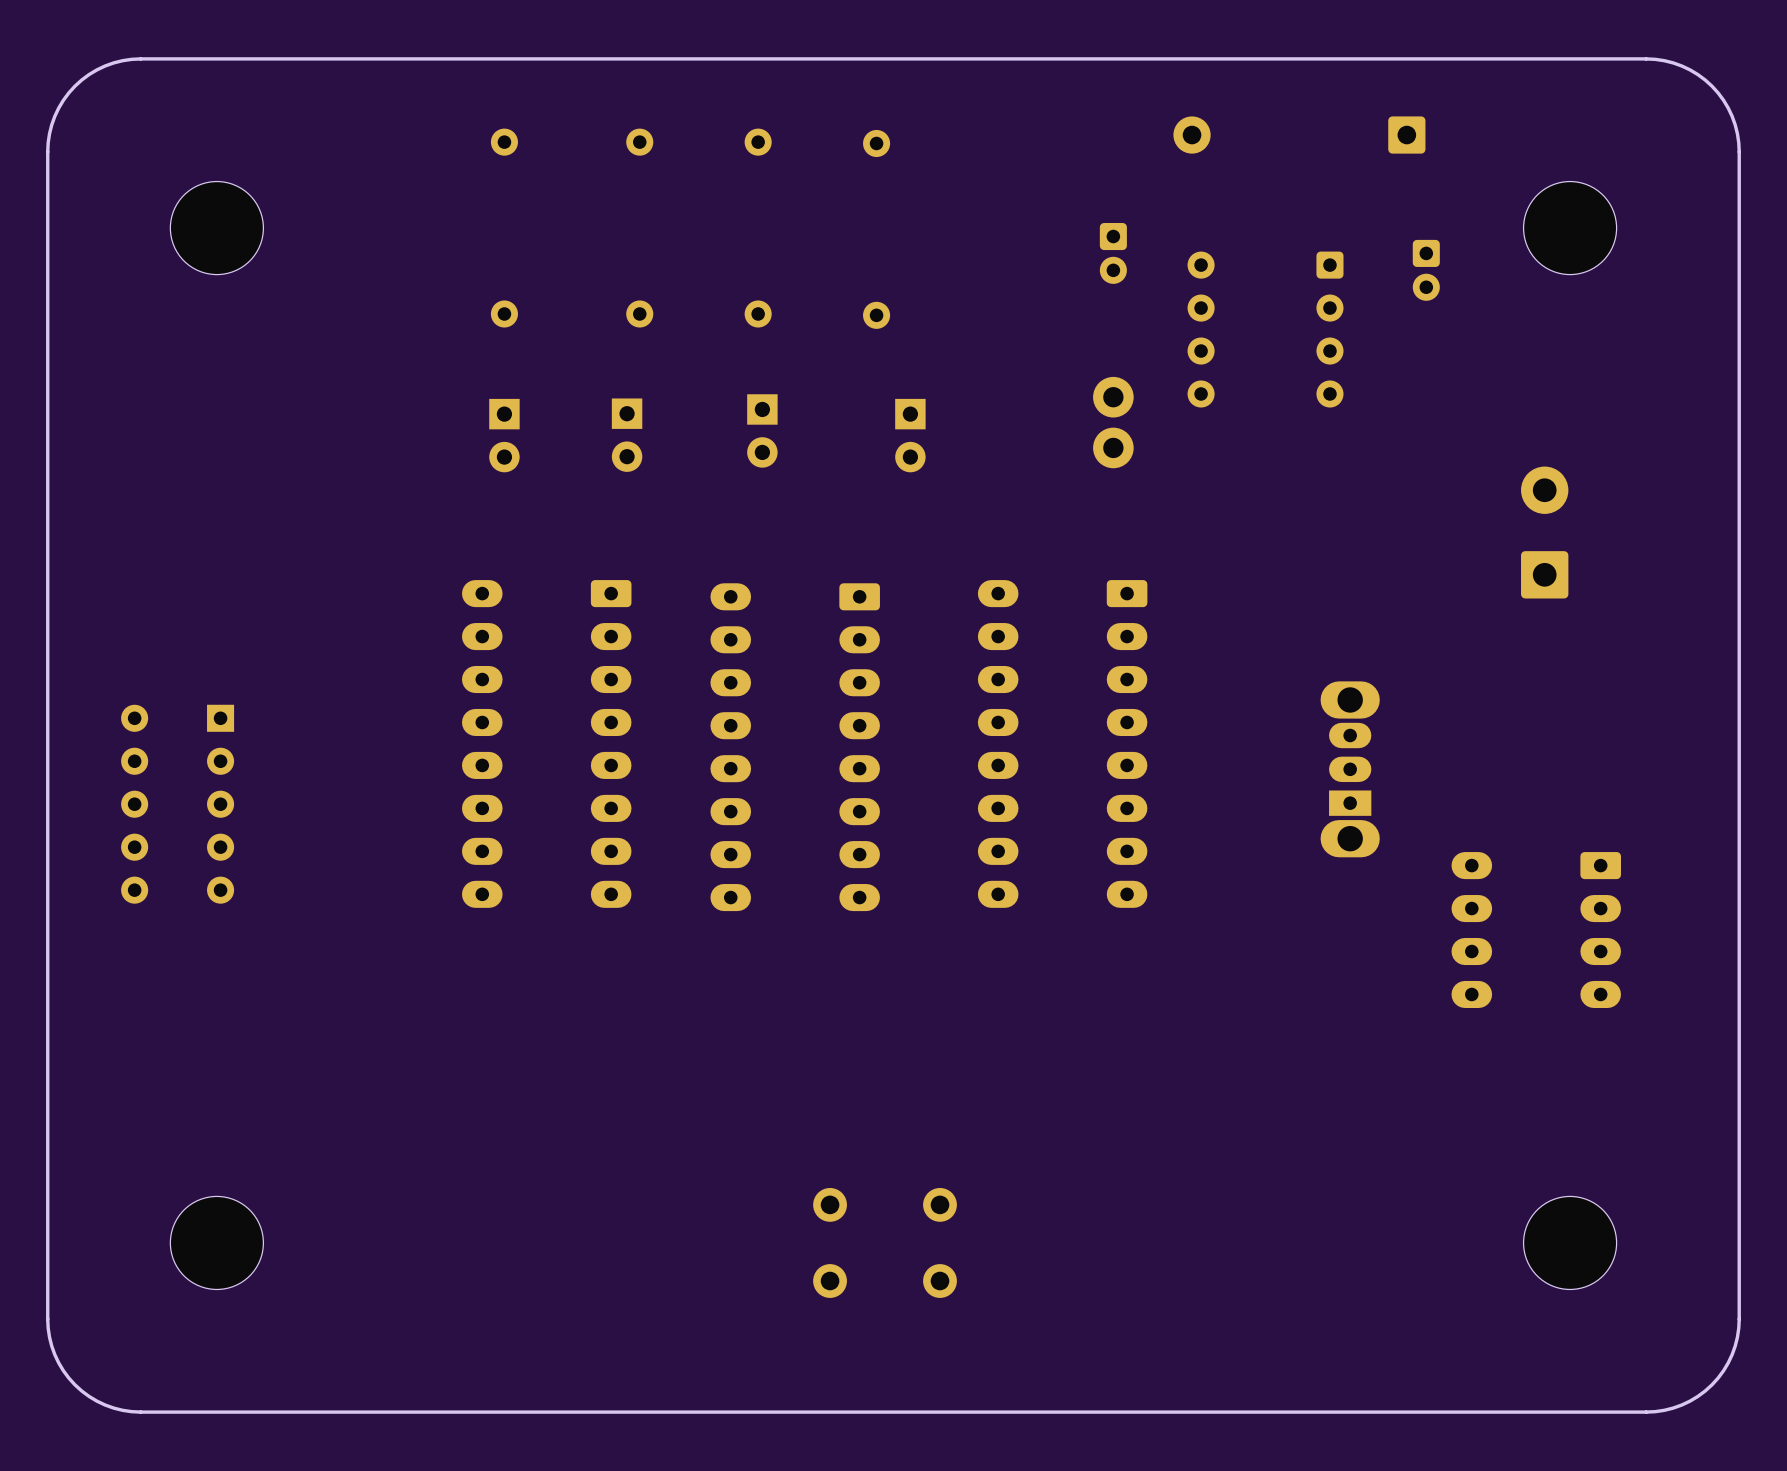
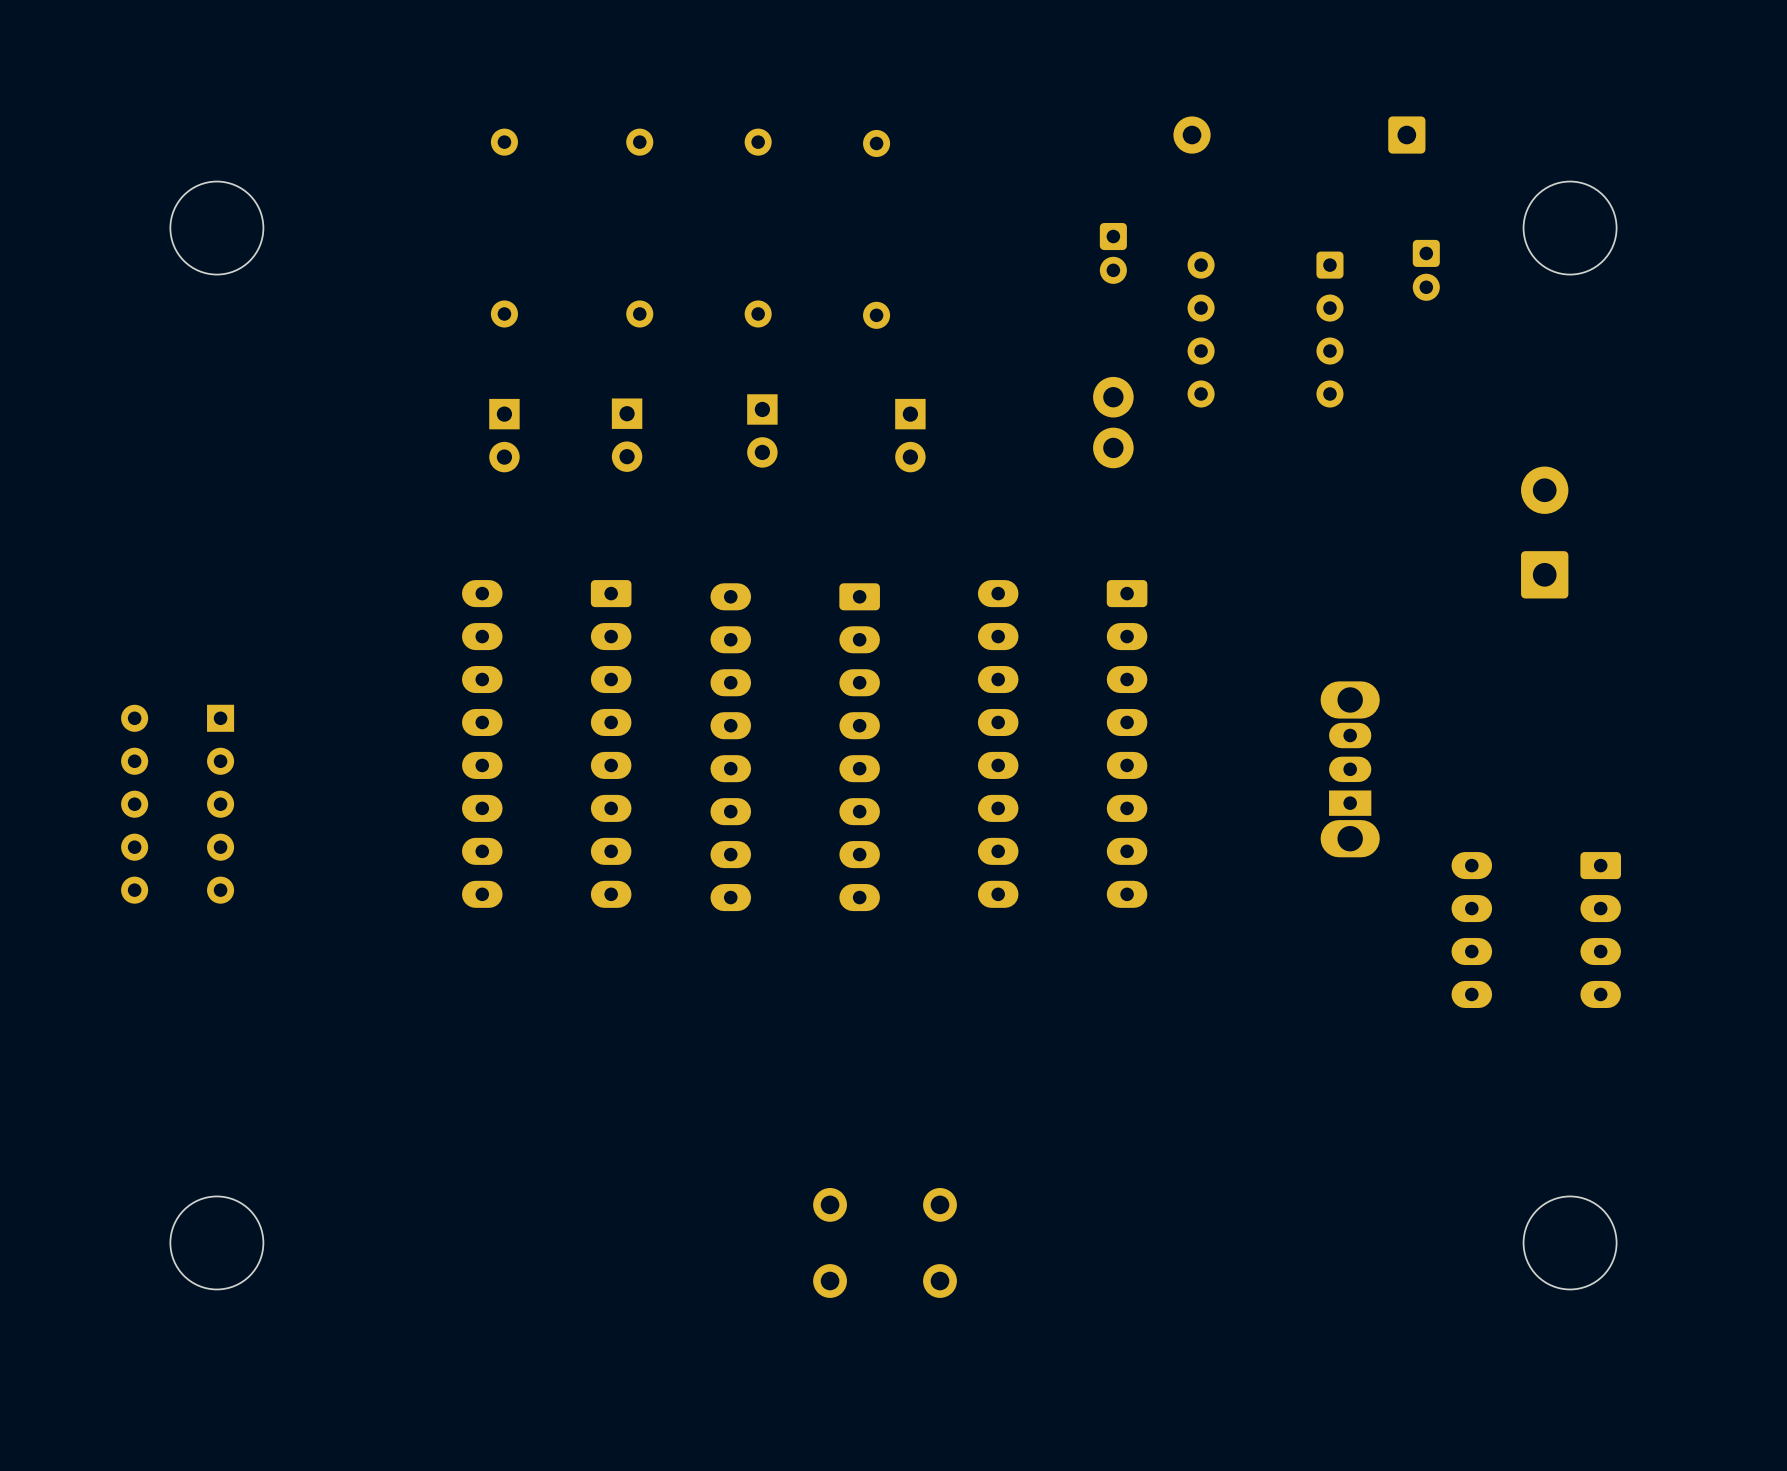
board edge: (1646, 58) (140, 58) (113, 62) (96, 69) (81, 80) (68, 92) (58, 108) (51, 124) (47, 151) (47, 1319) (49, 1337) (54, 1354) (68, 1378) (81, 1390) (96, 1401) (113, 1408) (140, 1412) (1646, 1412) (1664, 1410) (1681, 1405) (1705, 1390) (1718, 1378) (1728, 1362) (1735, 1346) (1739, 1319) (1739, 151) (1737, 133) (1732, 116) (1723, 100) (1711, 86) (1697, 74) (1681, 65) (1664, 60) (1646, 58) -> none

